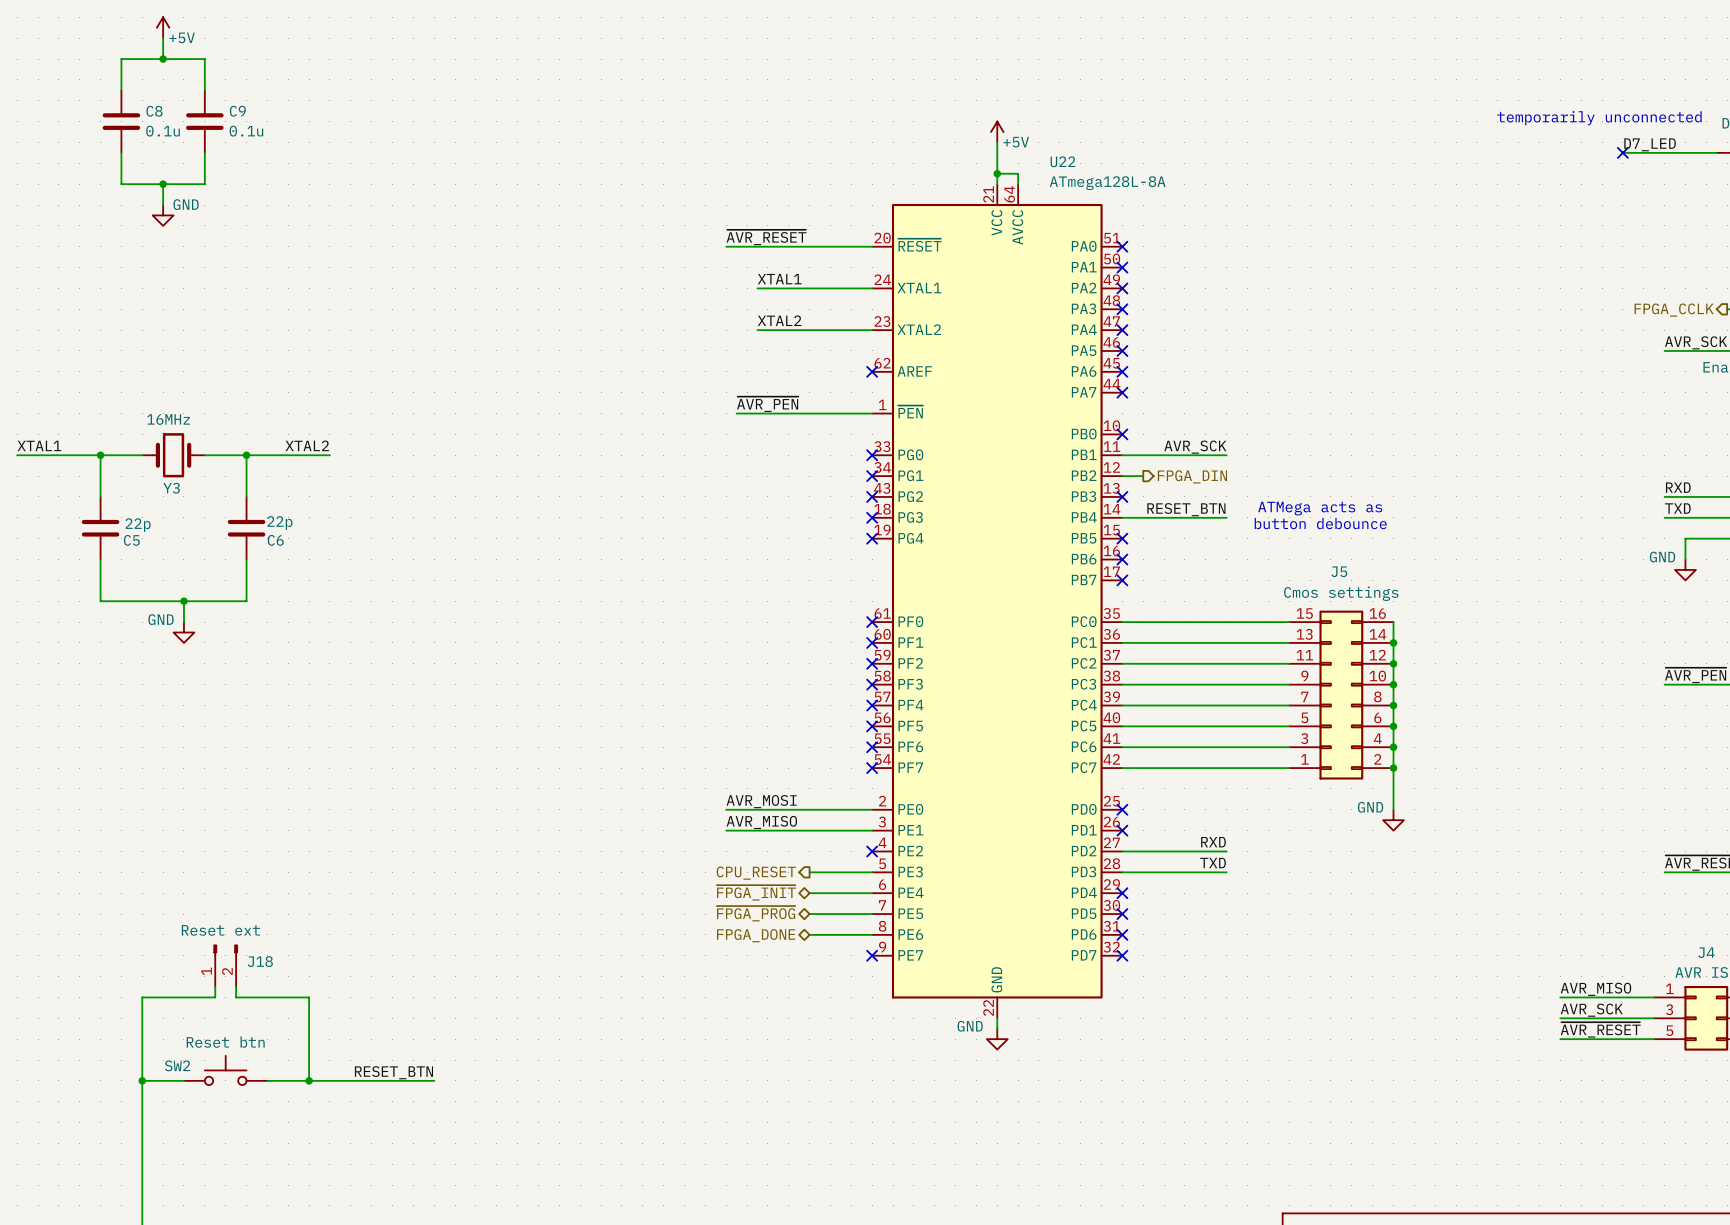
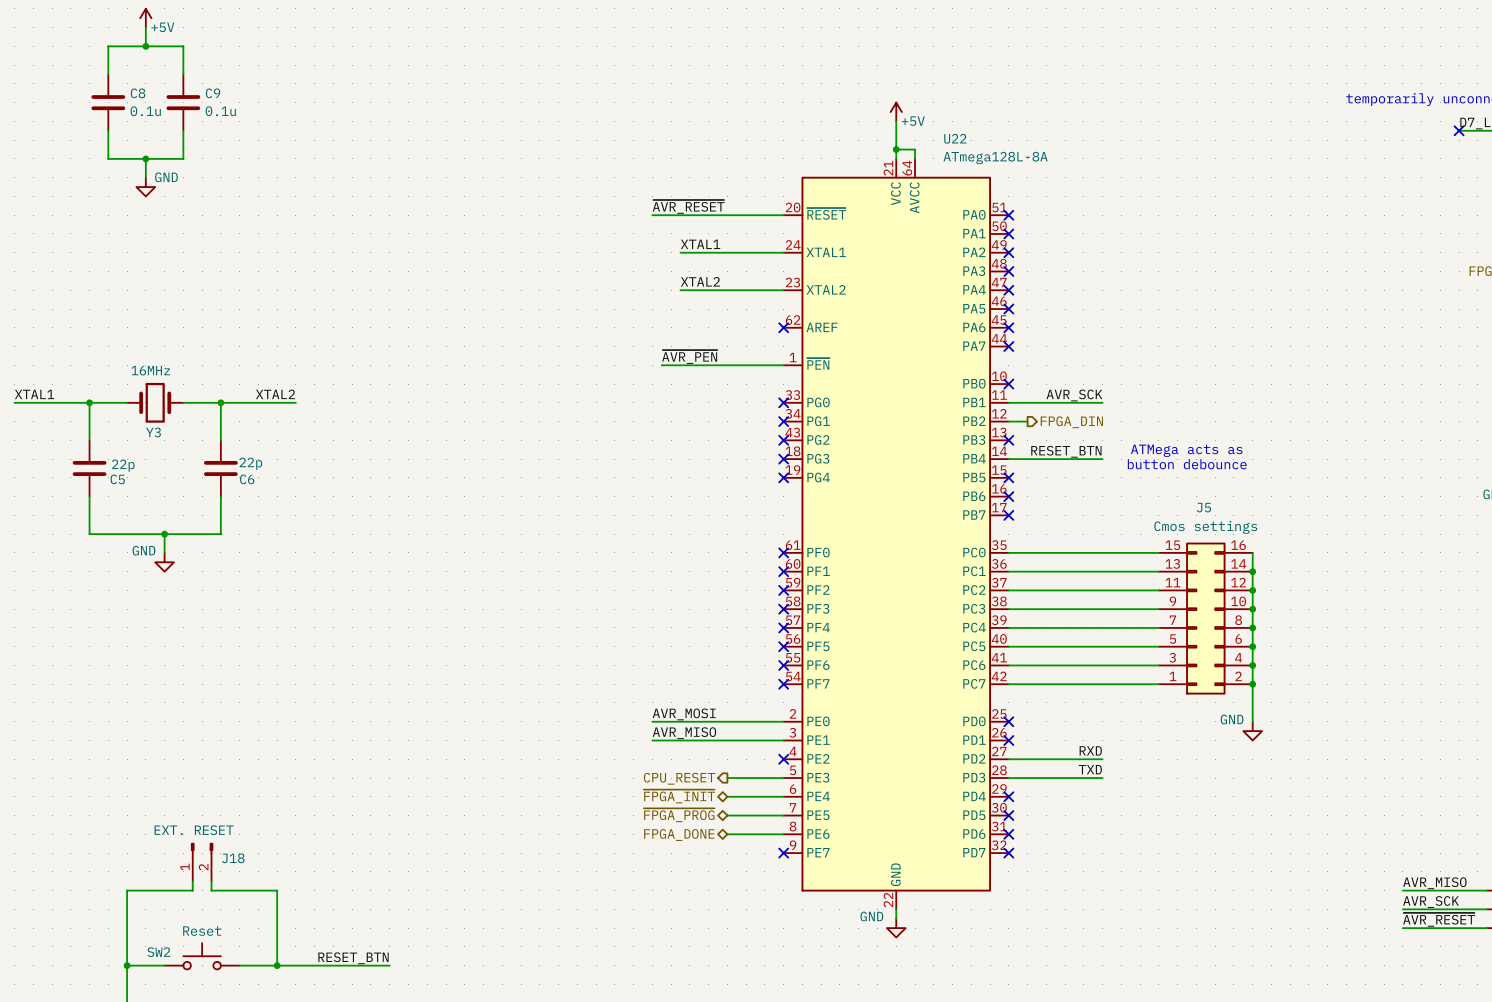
J18 value: Reset ext (220, 930) -> EXT. RESET (194, 830)
SW2 value: Reset btn (225, 1042) -> Reset (202, 931)

